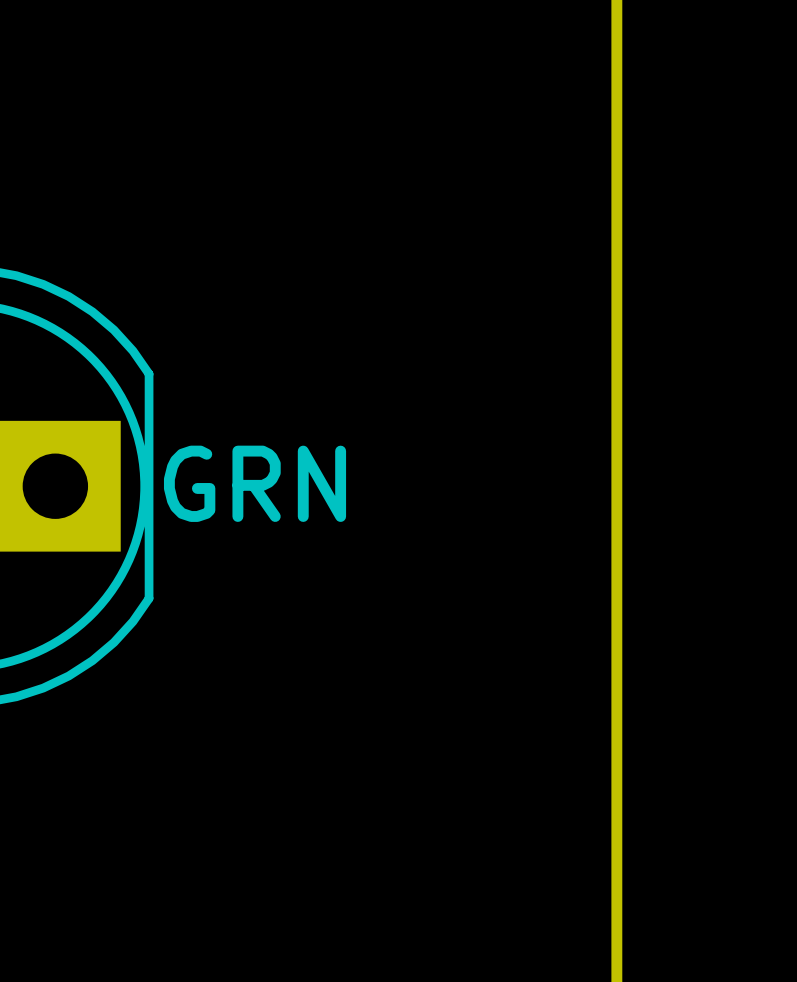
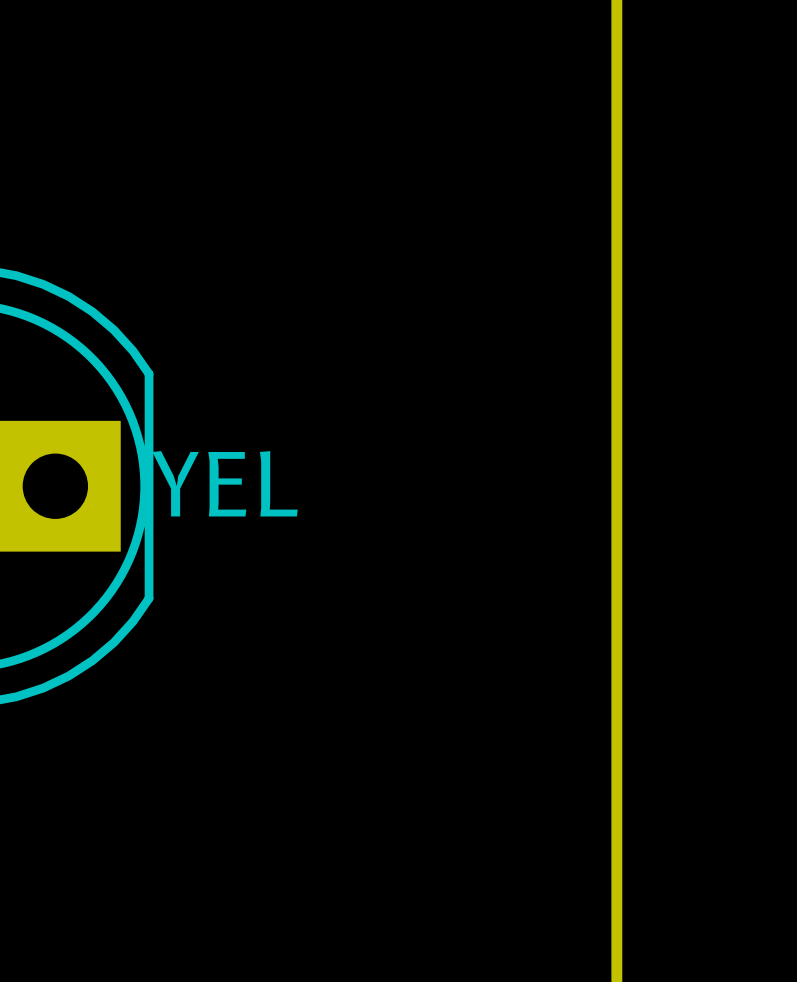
part value: GRN (255, 483) -> YEL (225, 483)

